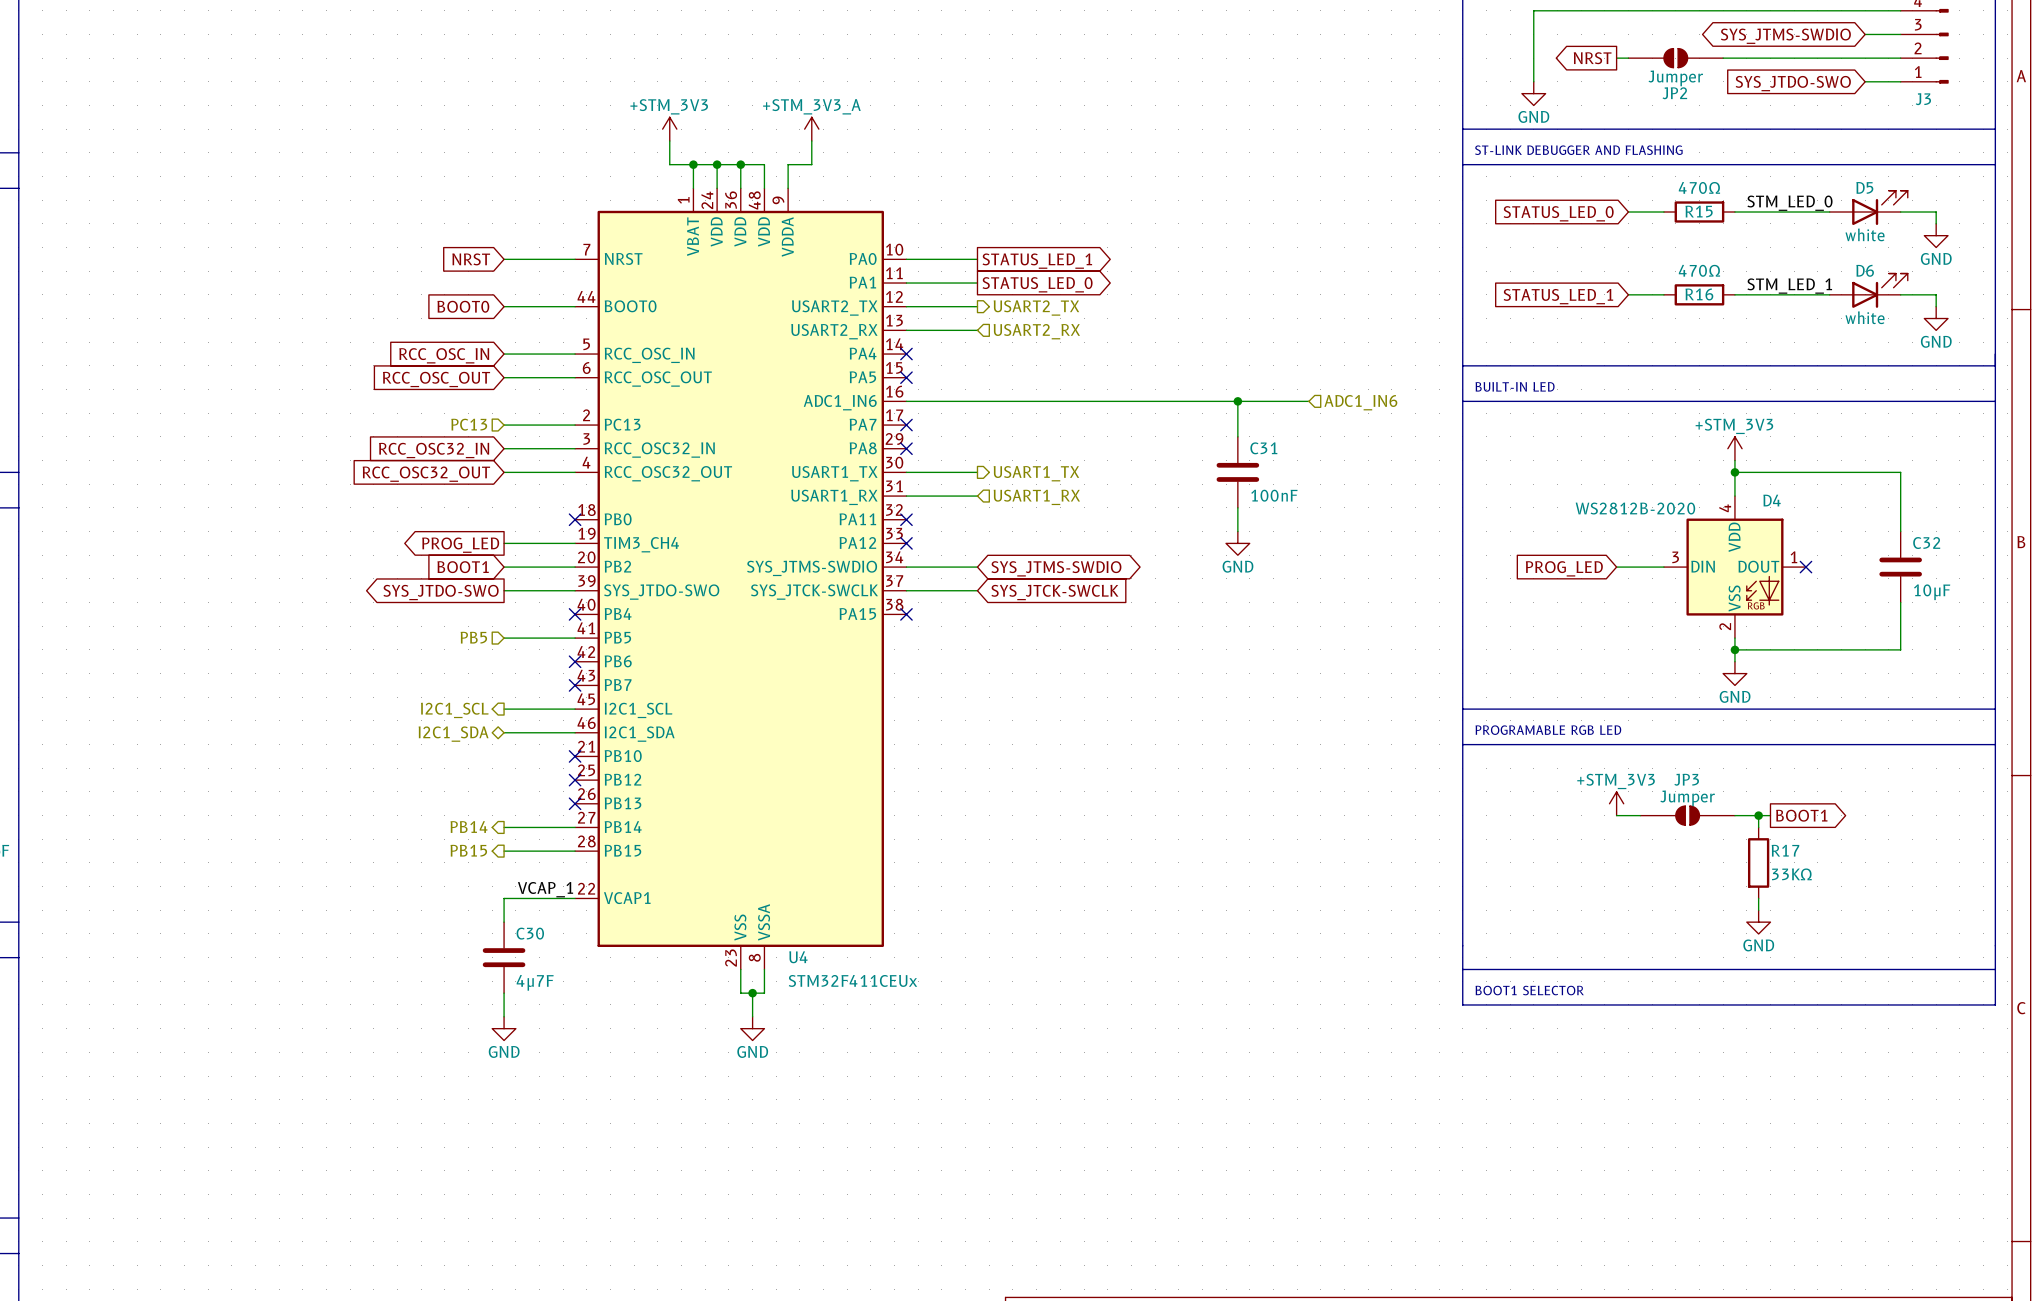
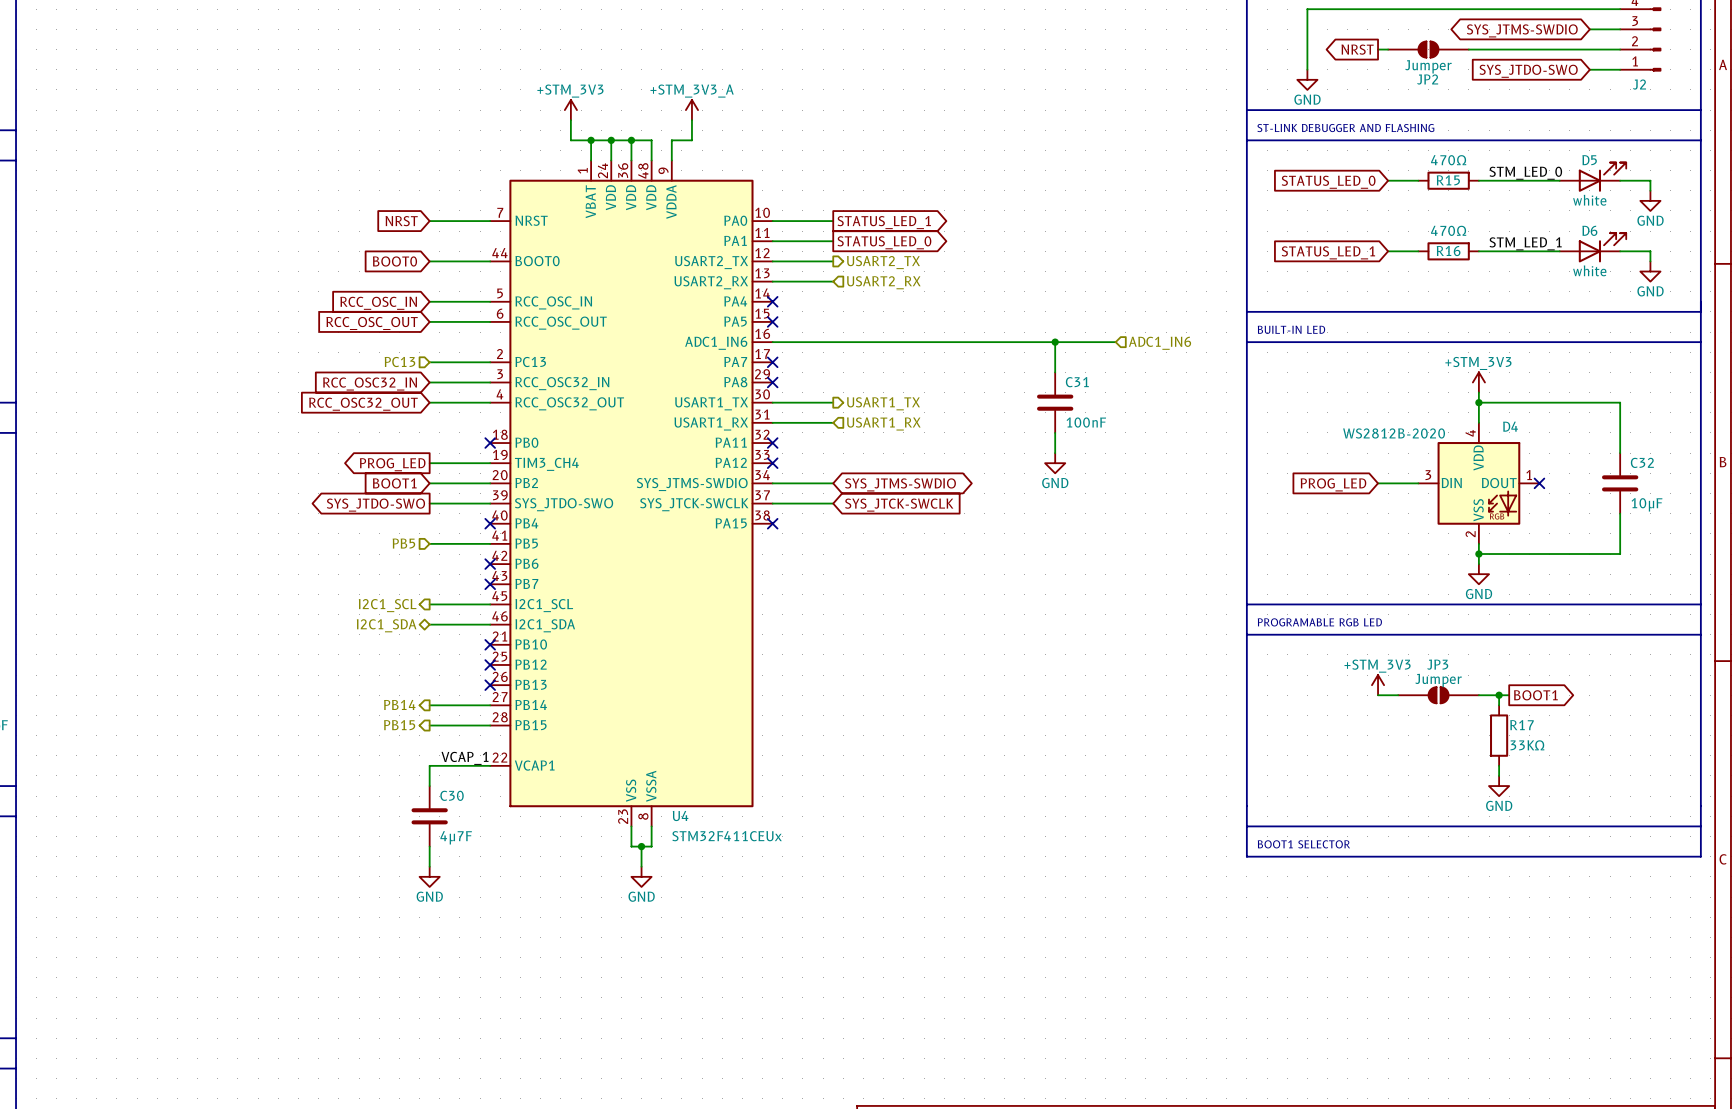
J3 name: J3 (1923, 99) -> J2 (1639, 84)

